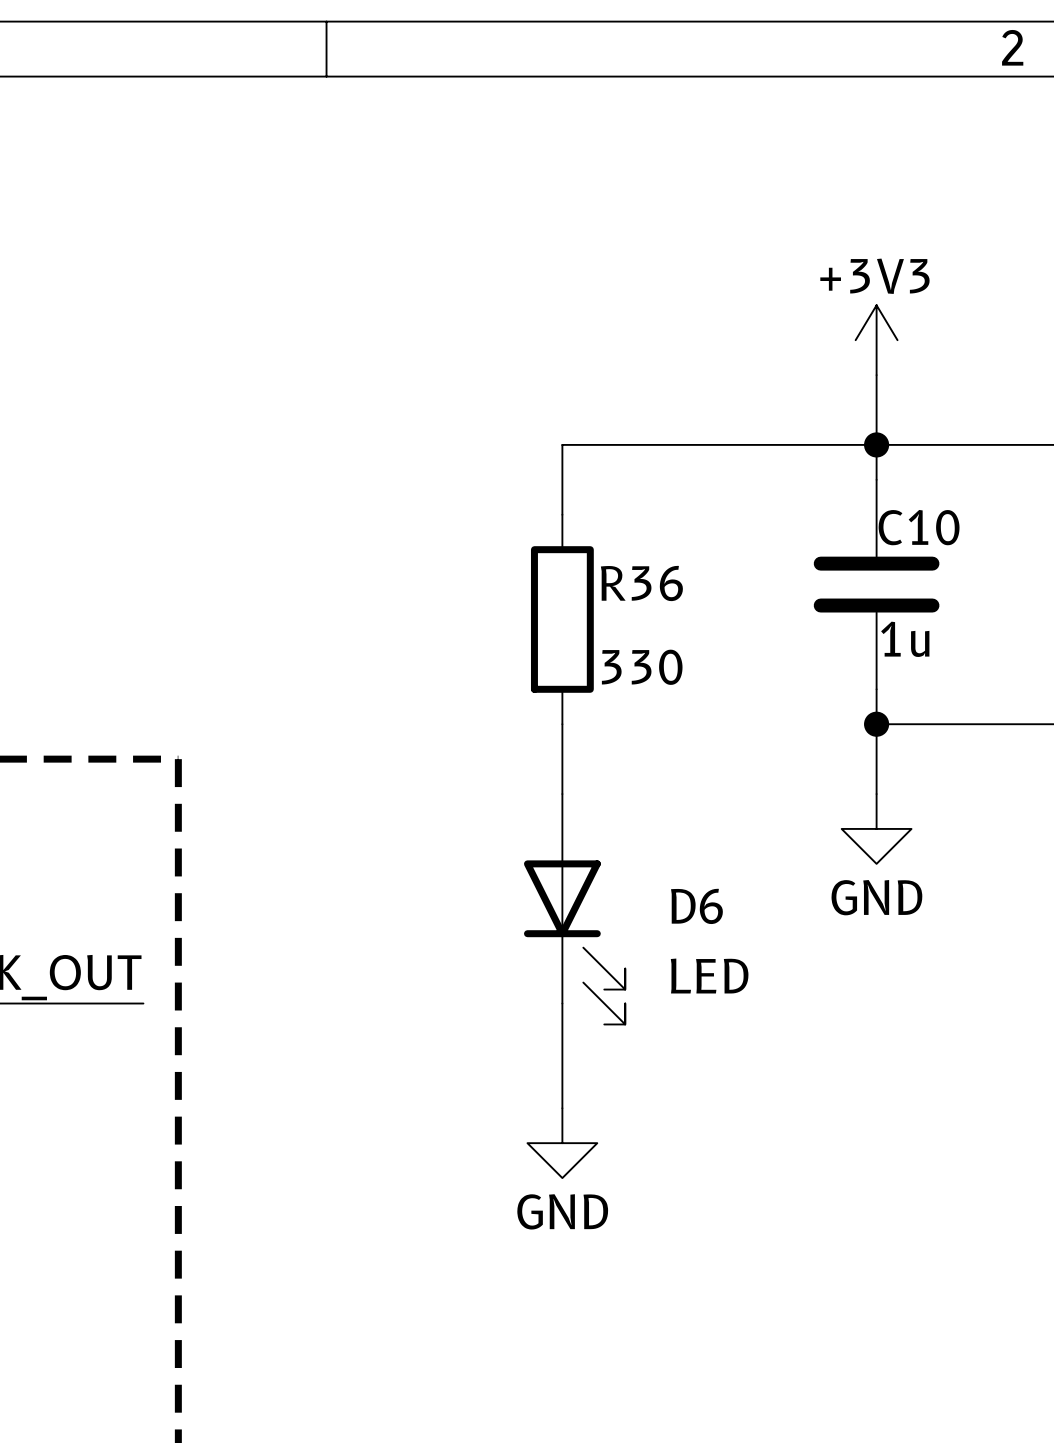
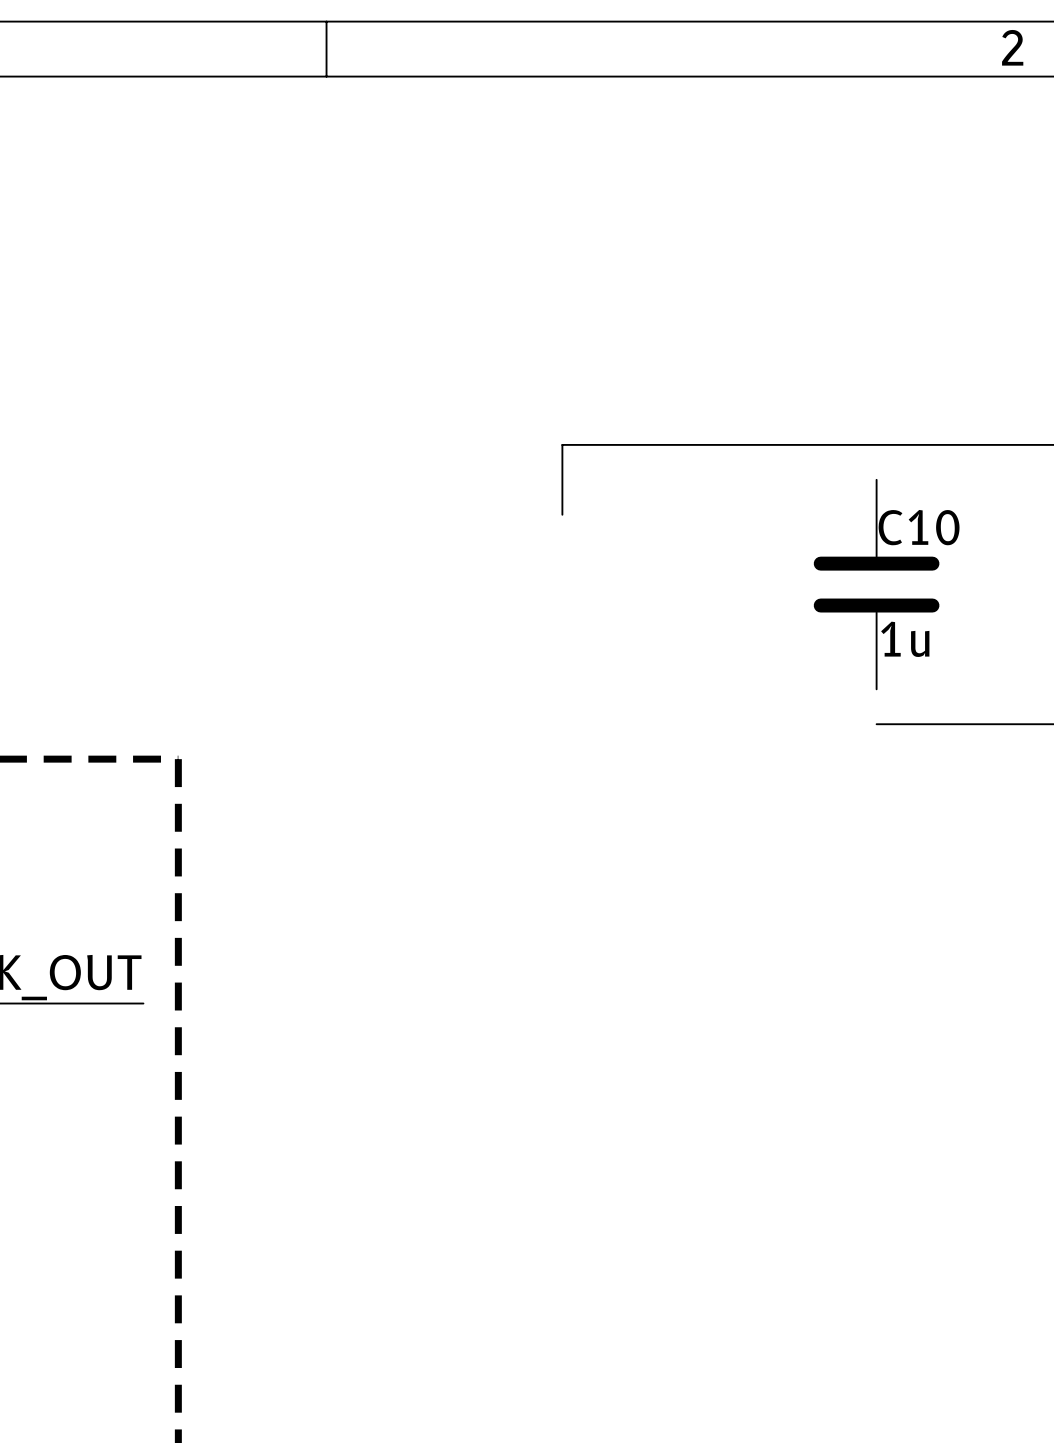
power symbol: +3V3 (876, 340) -> none
wire: (876, 375) (876, 479) -> none
junction: (876, 444) -> none
R36: 330 (562, 619) -> none
wire: (876, 689) (876, 794) -> none
wire: (562, 724) (562, 794) -> none
junction: (876, 724) -> none
power symbol: GND (876, 828) -> none
D6: LED (574, 909) -> none
wire: (562, 1003) (562, 1108) -> none
power symbol: GND (562, 1143) -> none

